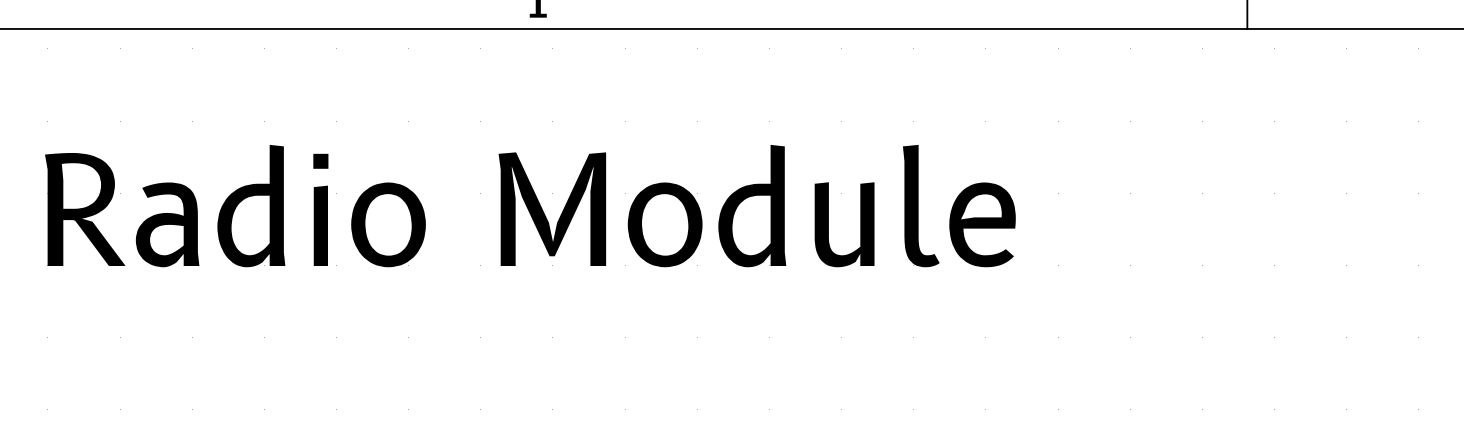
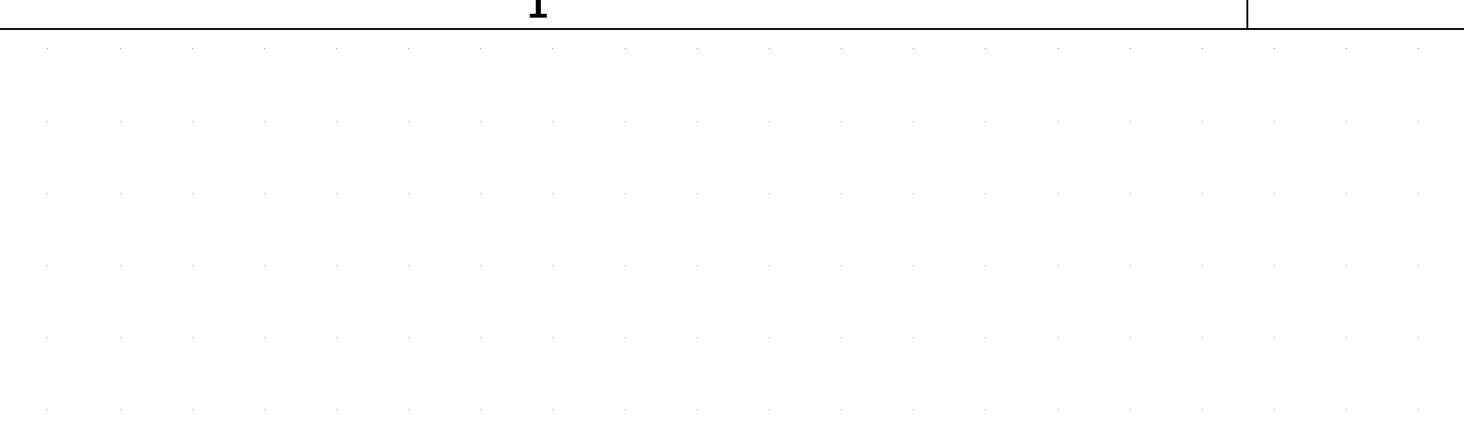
text: Radio Module (530, 206) -> none

